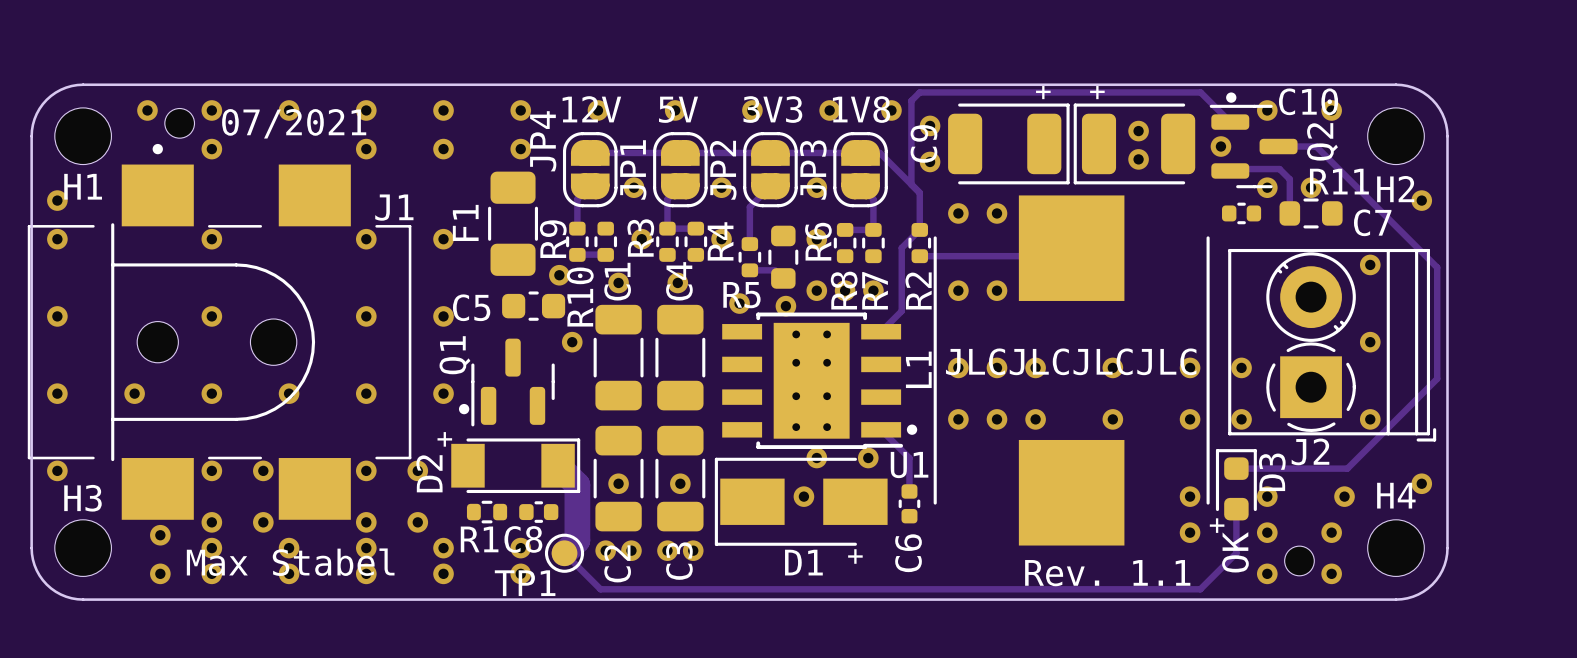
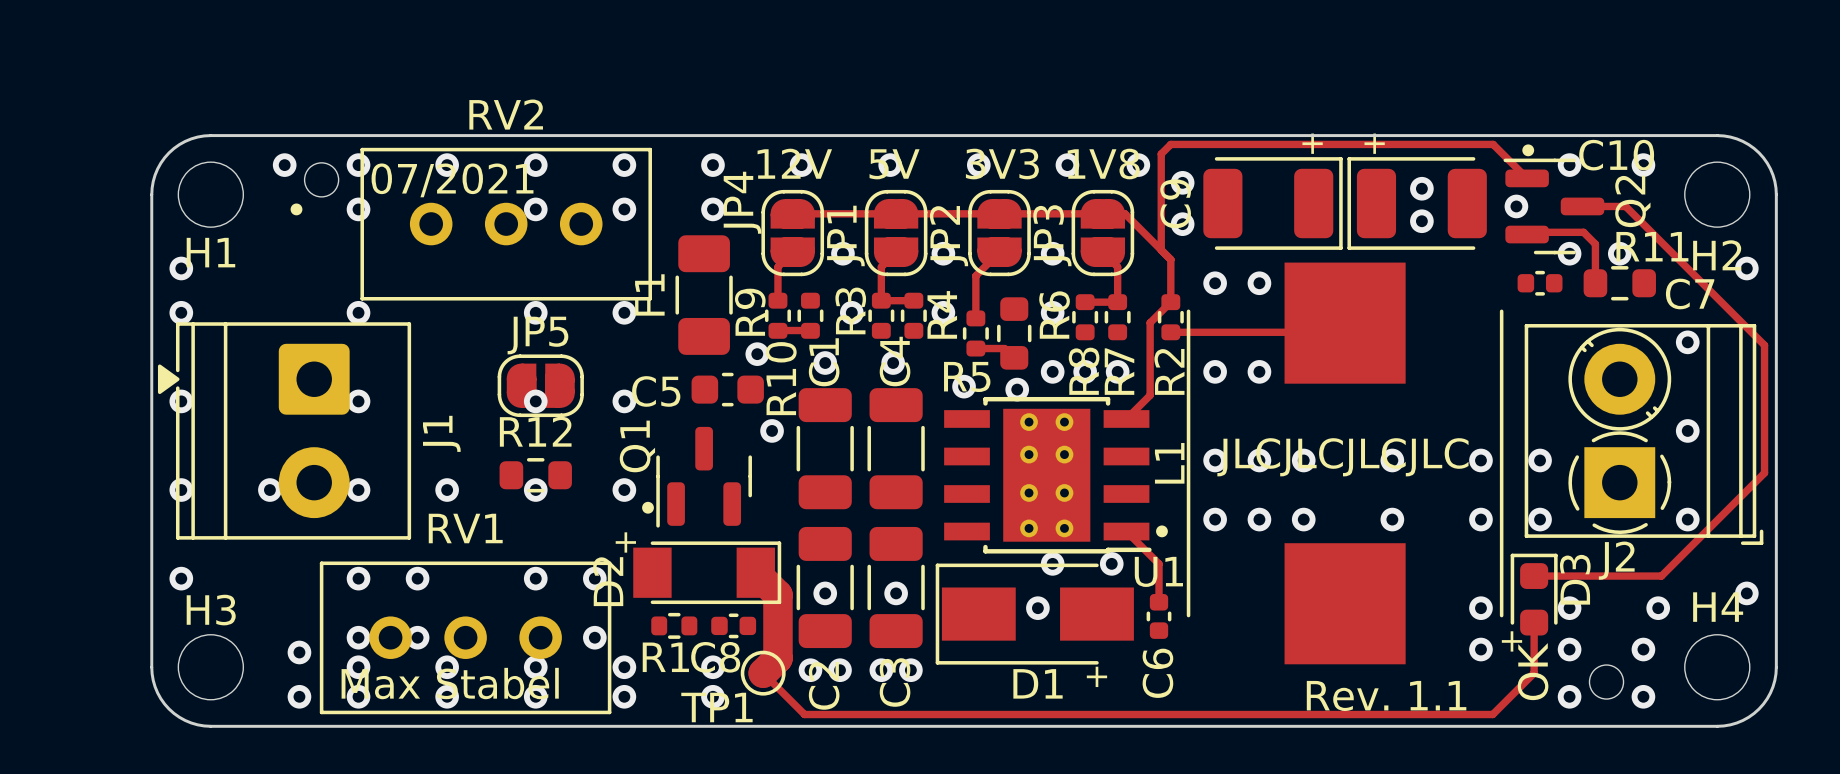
RV2: none -> (506, 224)
J1 footprint: [27, 164, 412, 520] -> [157, 322, 412, 540]
J1 name position: J1 (394, 207) -> J1 (441, 433)
JP5: none -> (540, 385)
R12: none -> (535, 475)
RV1: none -> (465, 637)

